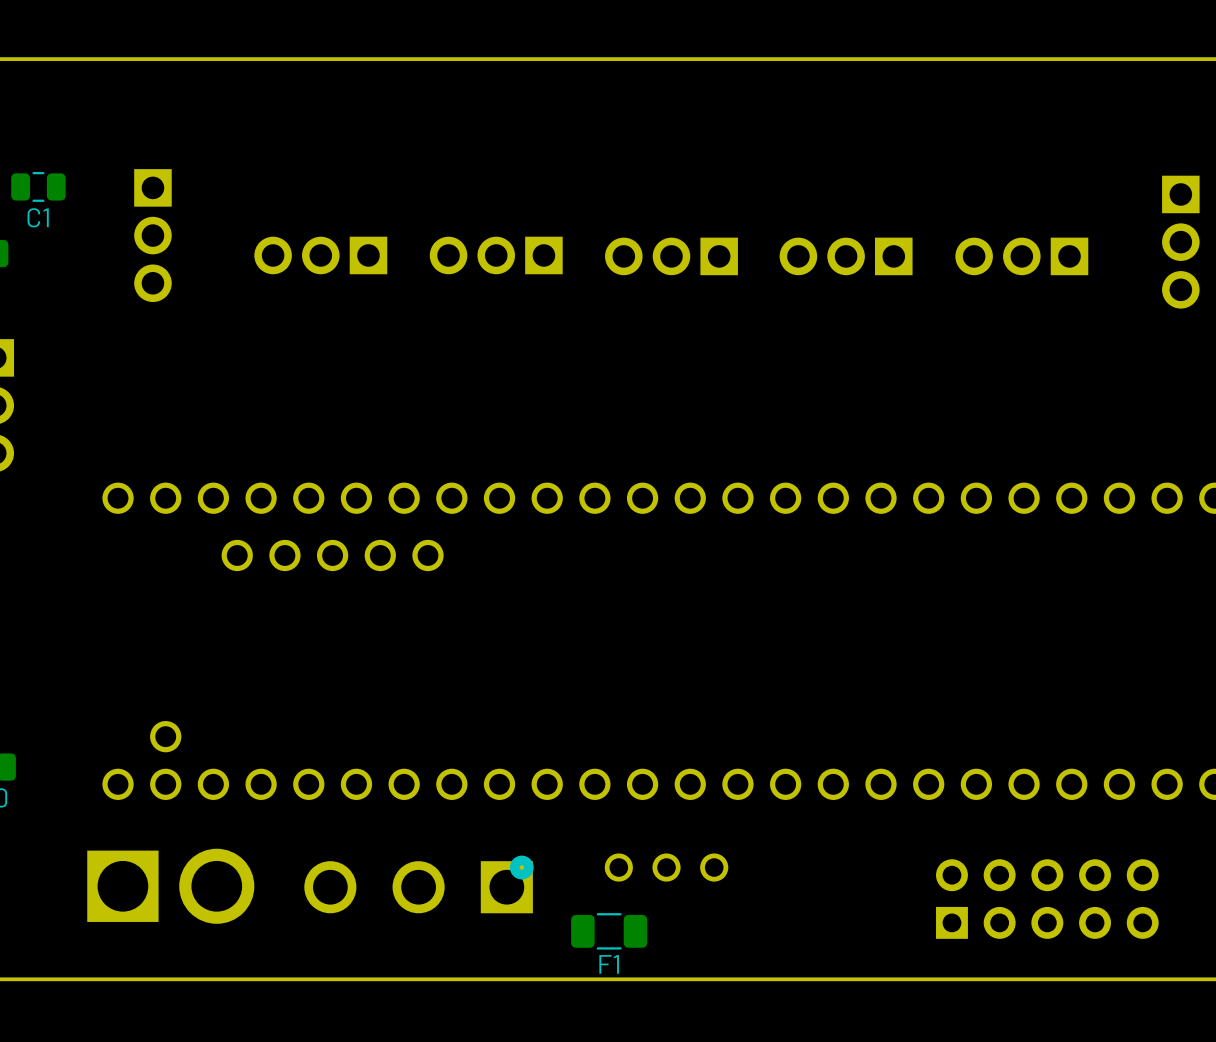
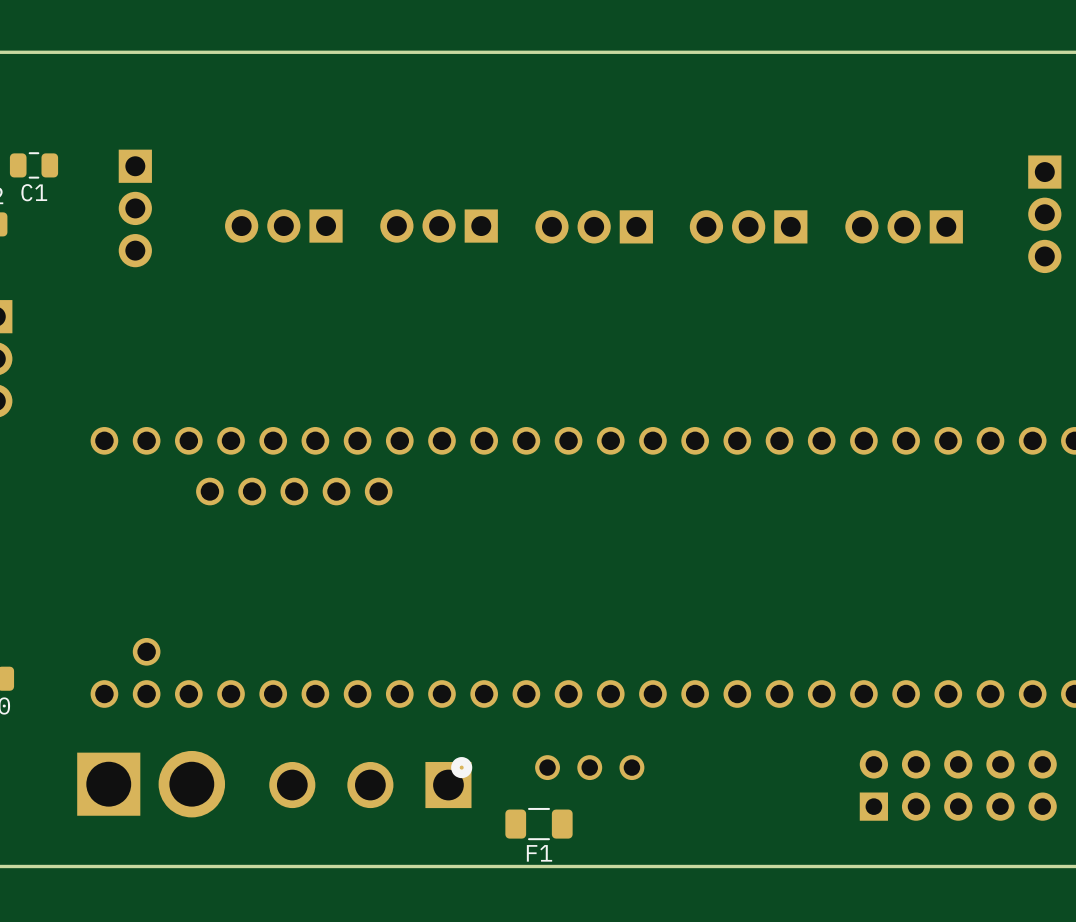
part position: (1047, 899) -> (958, 785)

